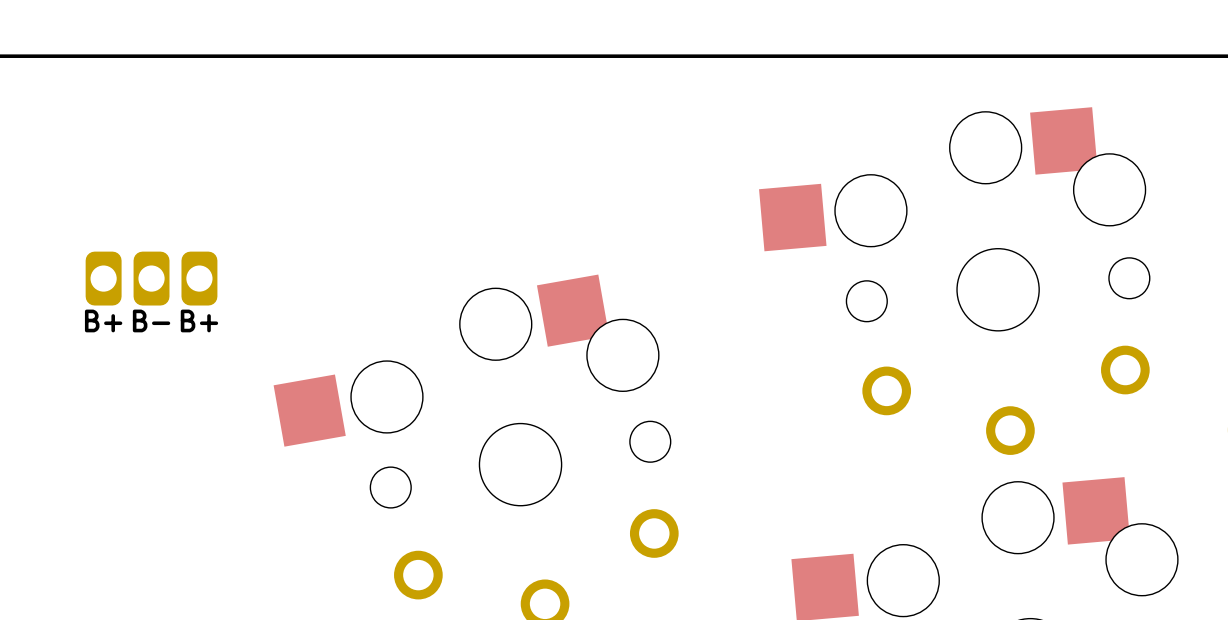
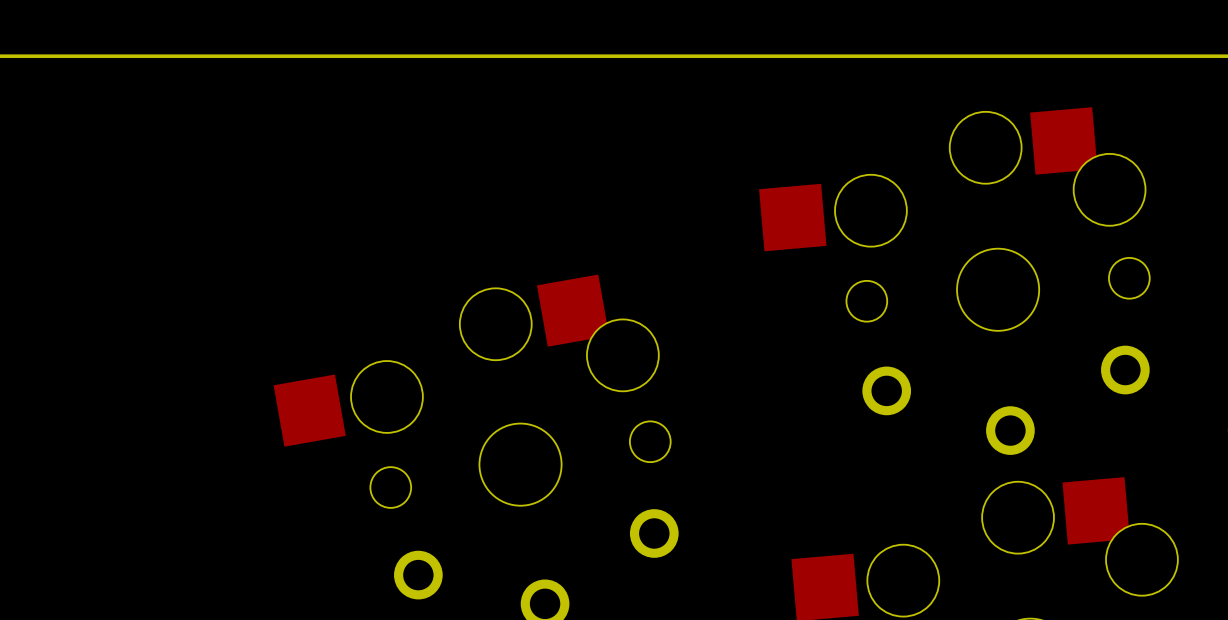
part: (151, 278) -> none

